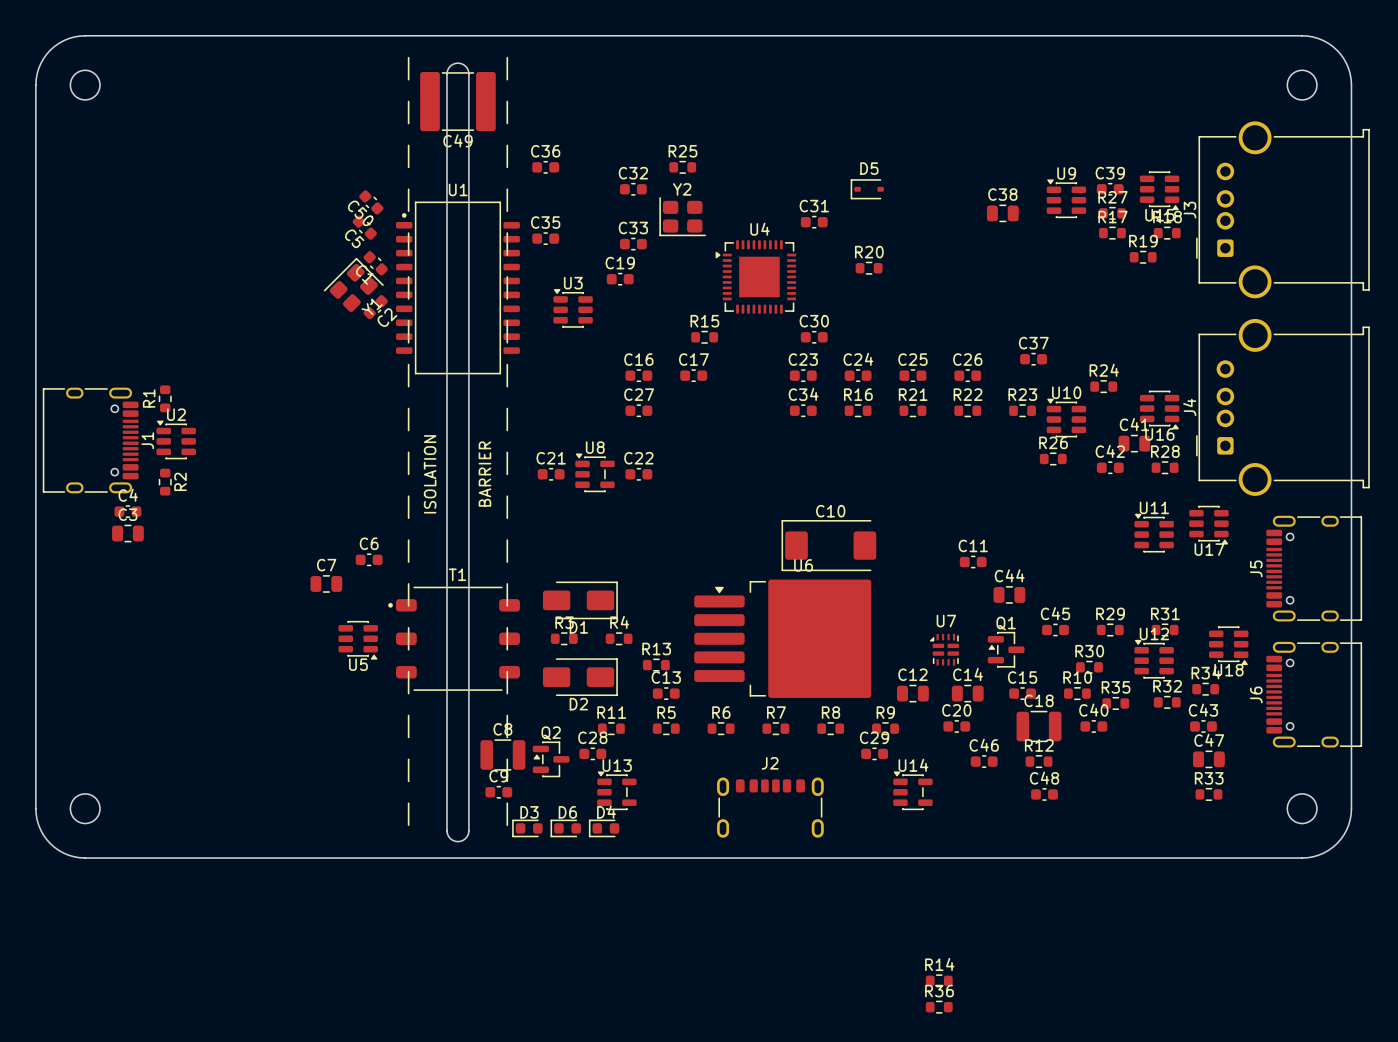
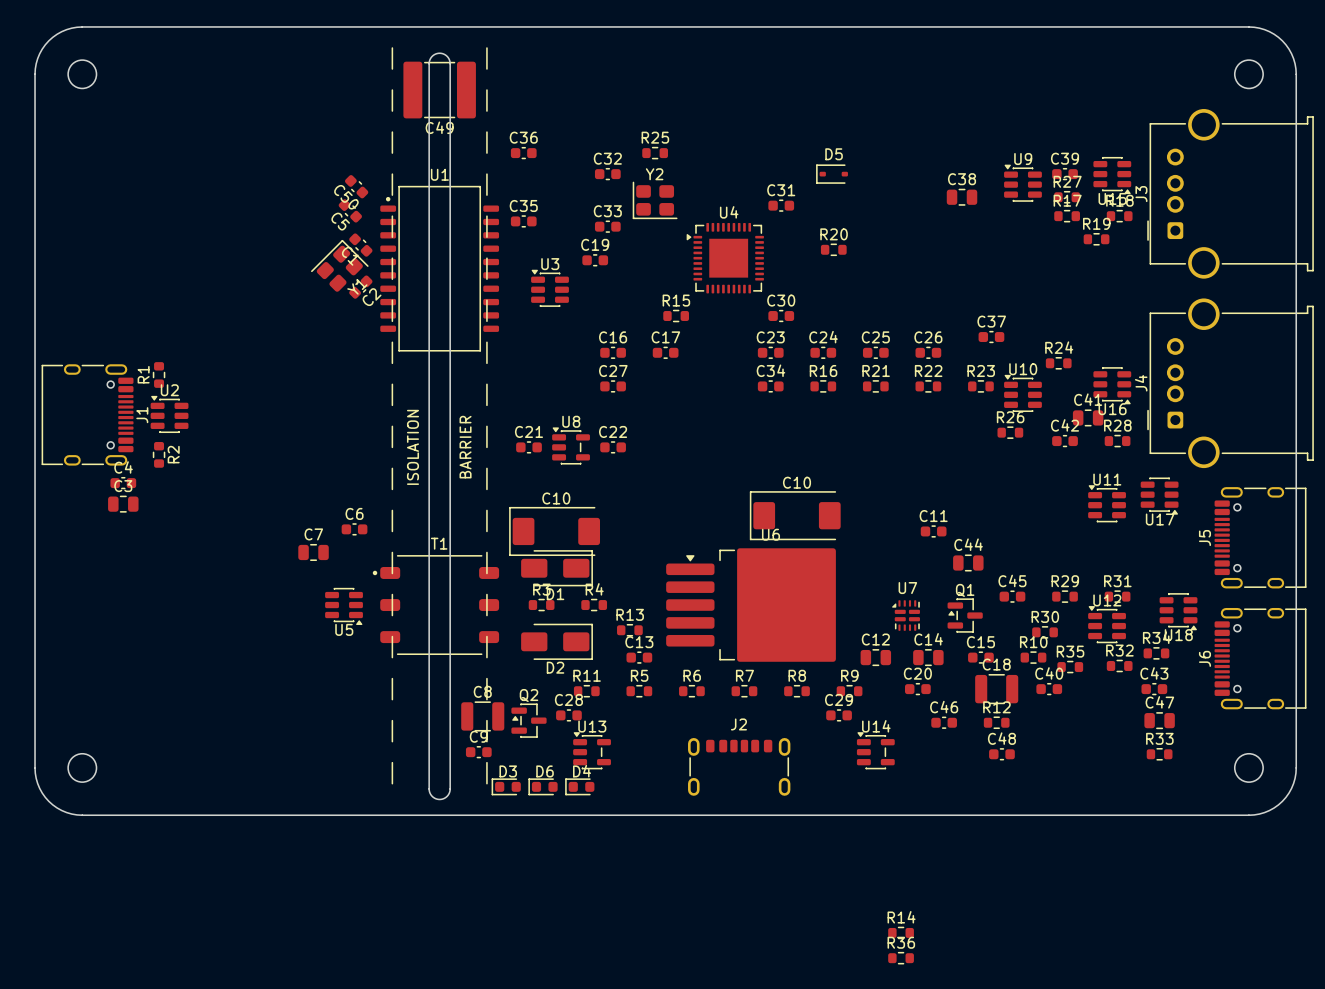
C10: none -> (554, 531)

